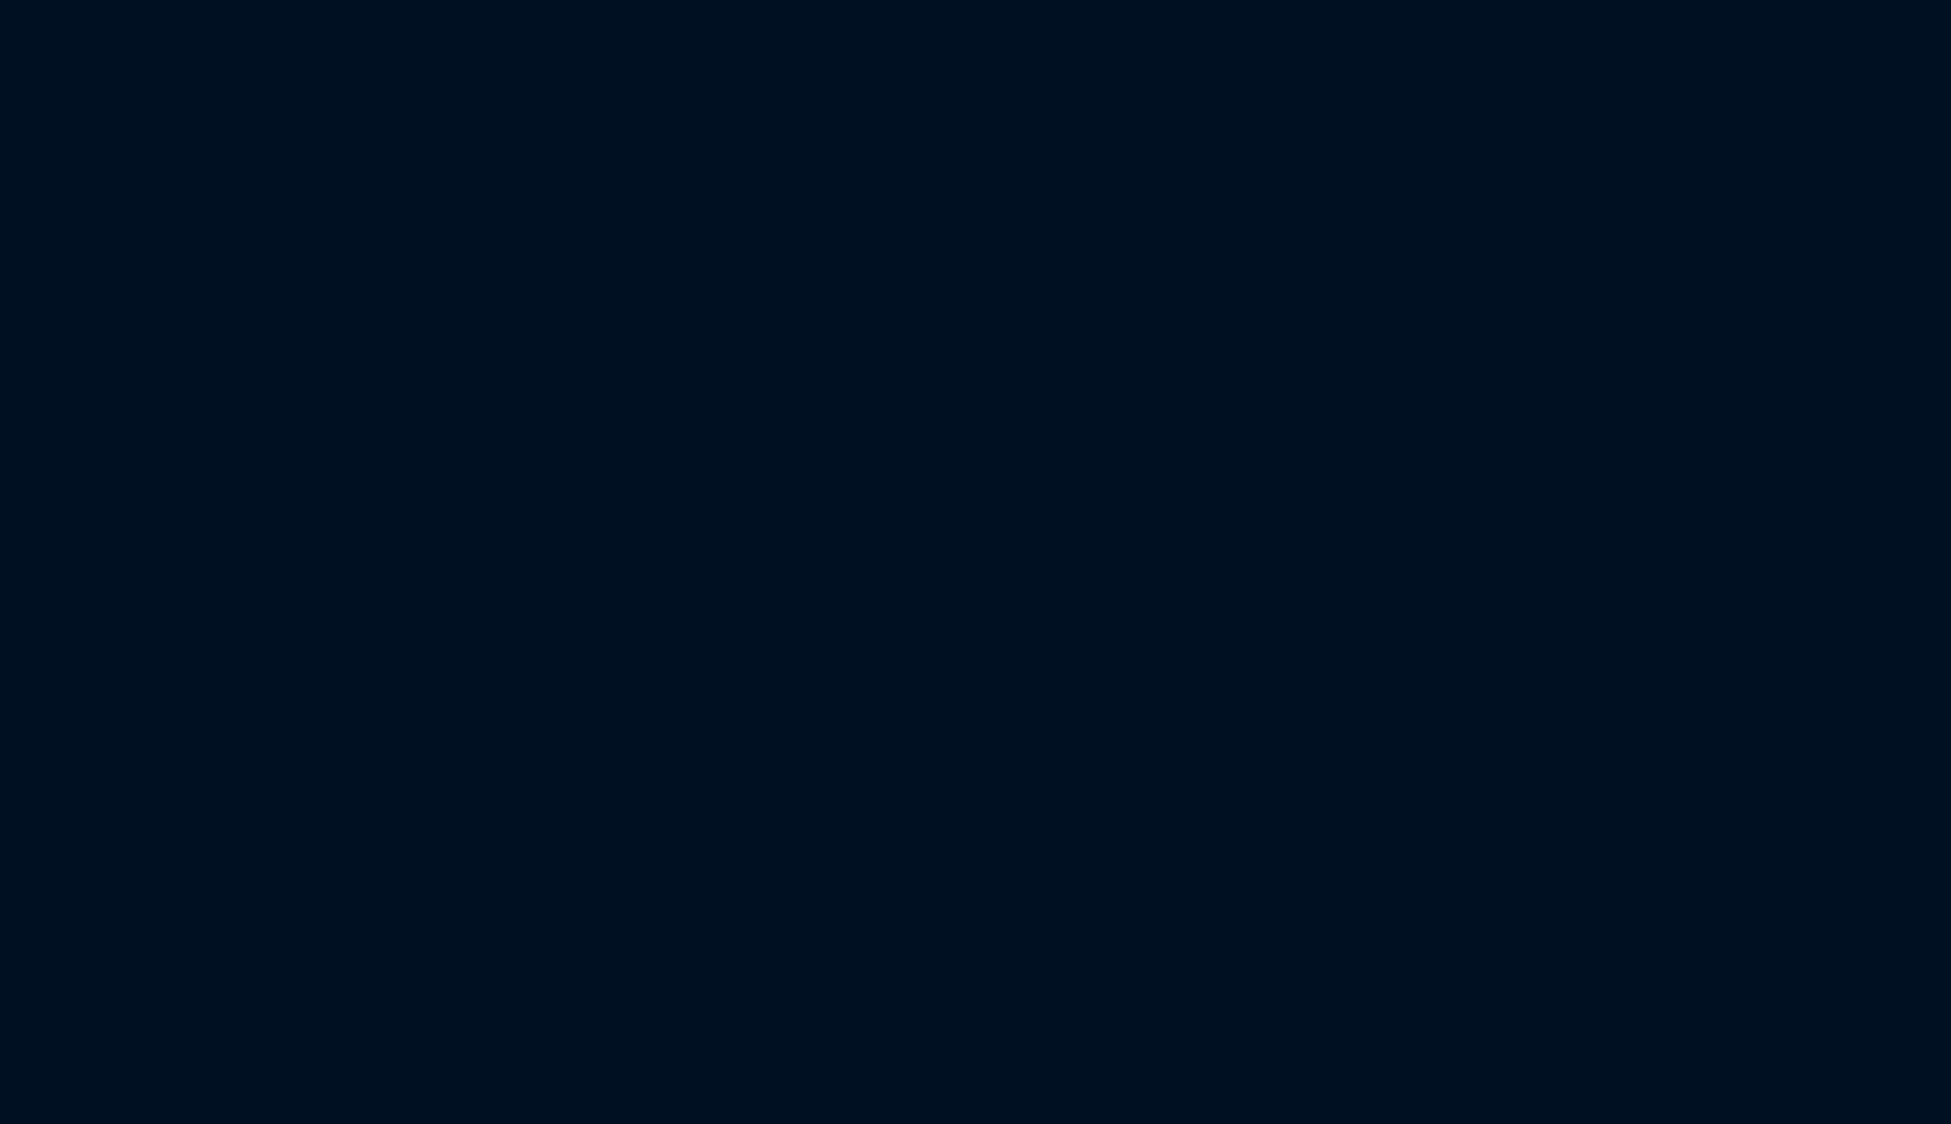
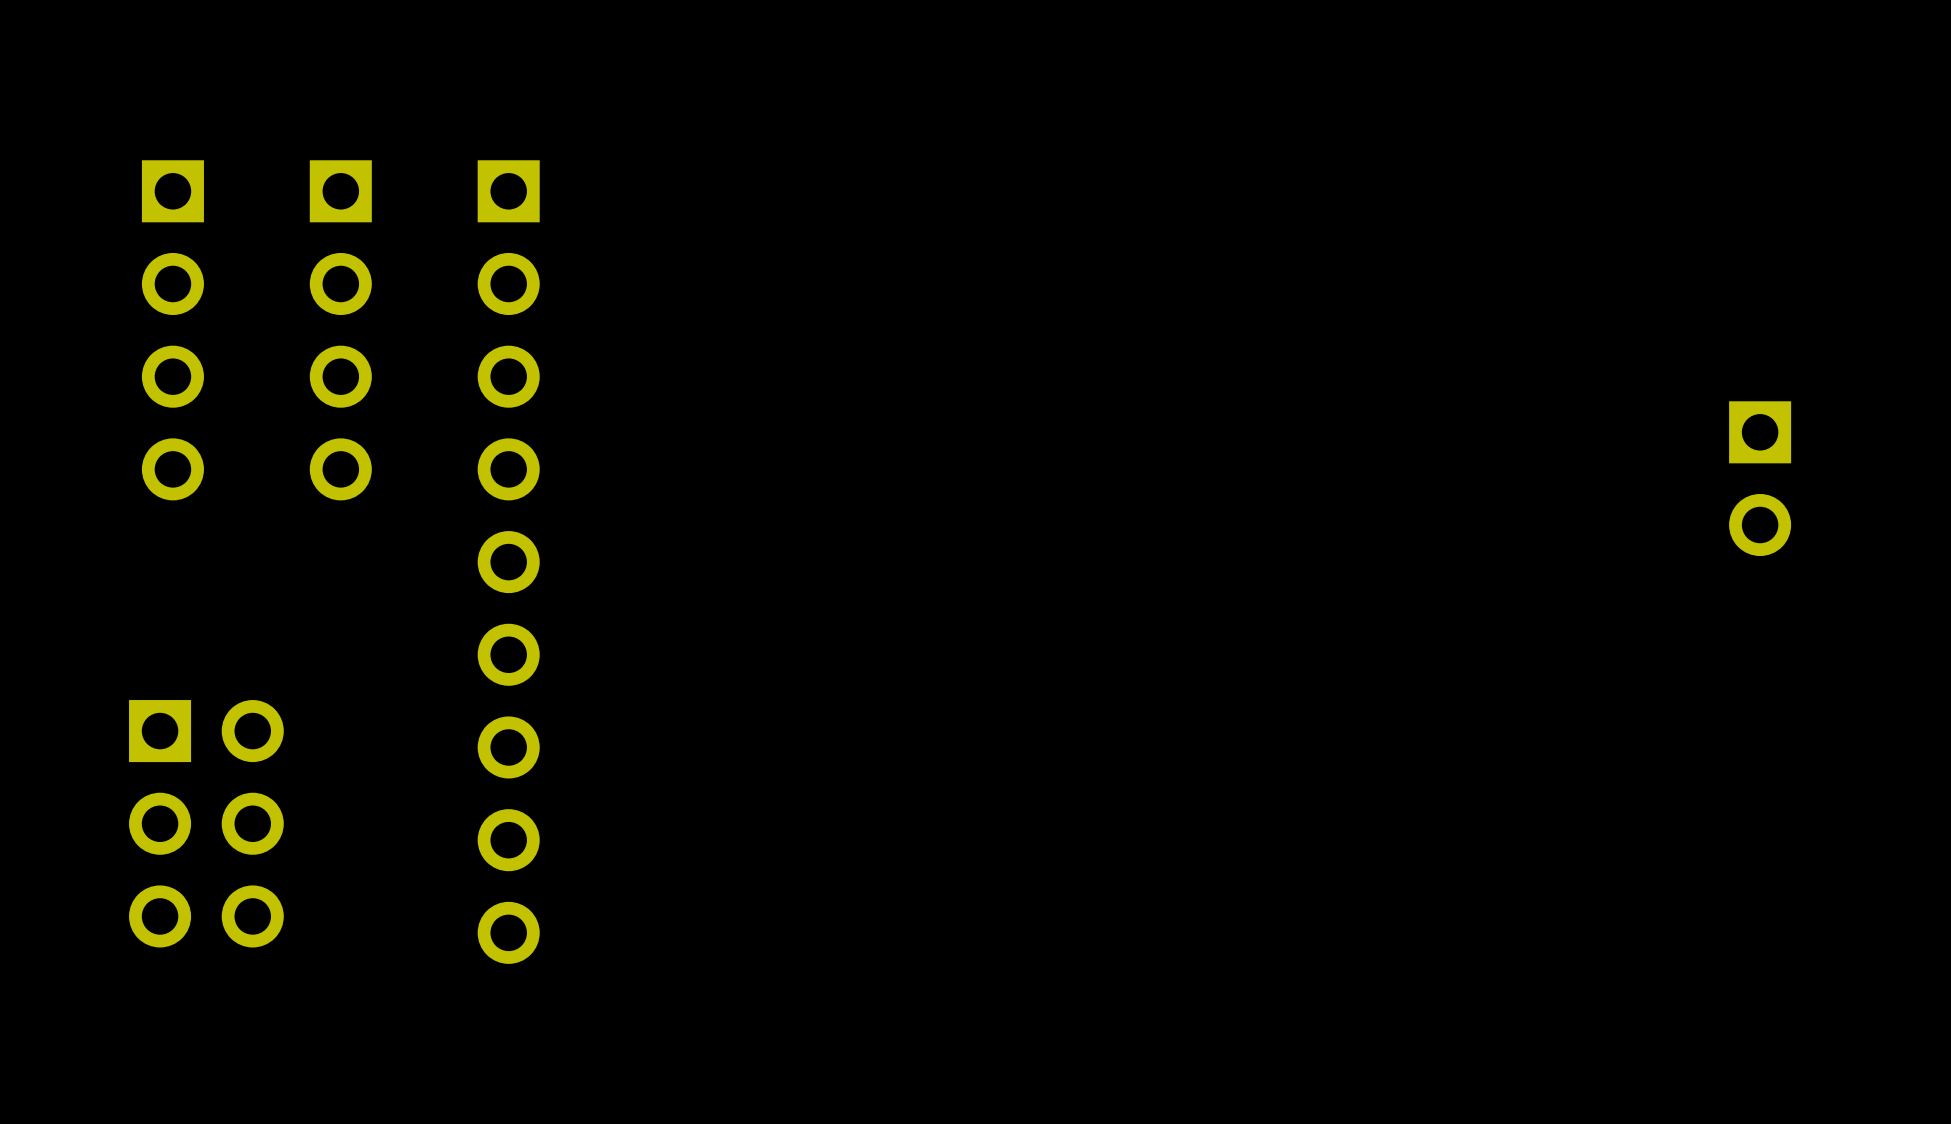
part: none -> (172, 330)
part: none -> (340, 330)
part: none -> (1760, 478)
part: none -> (508, 562)
part: none -> (206, 823)

